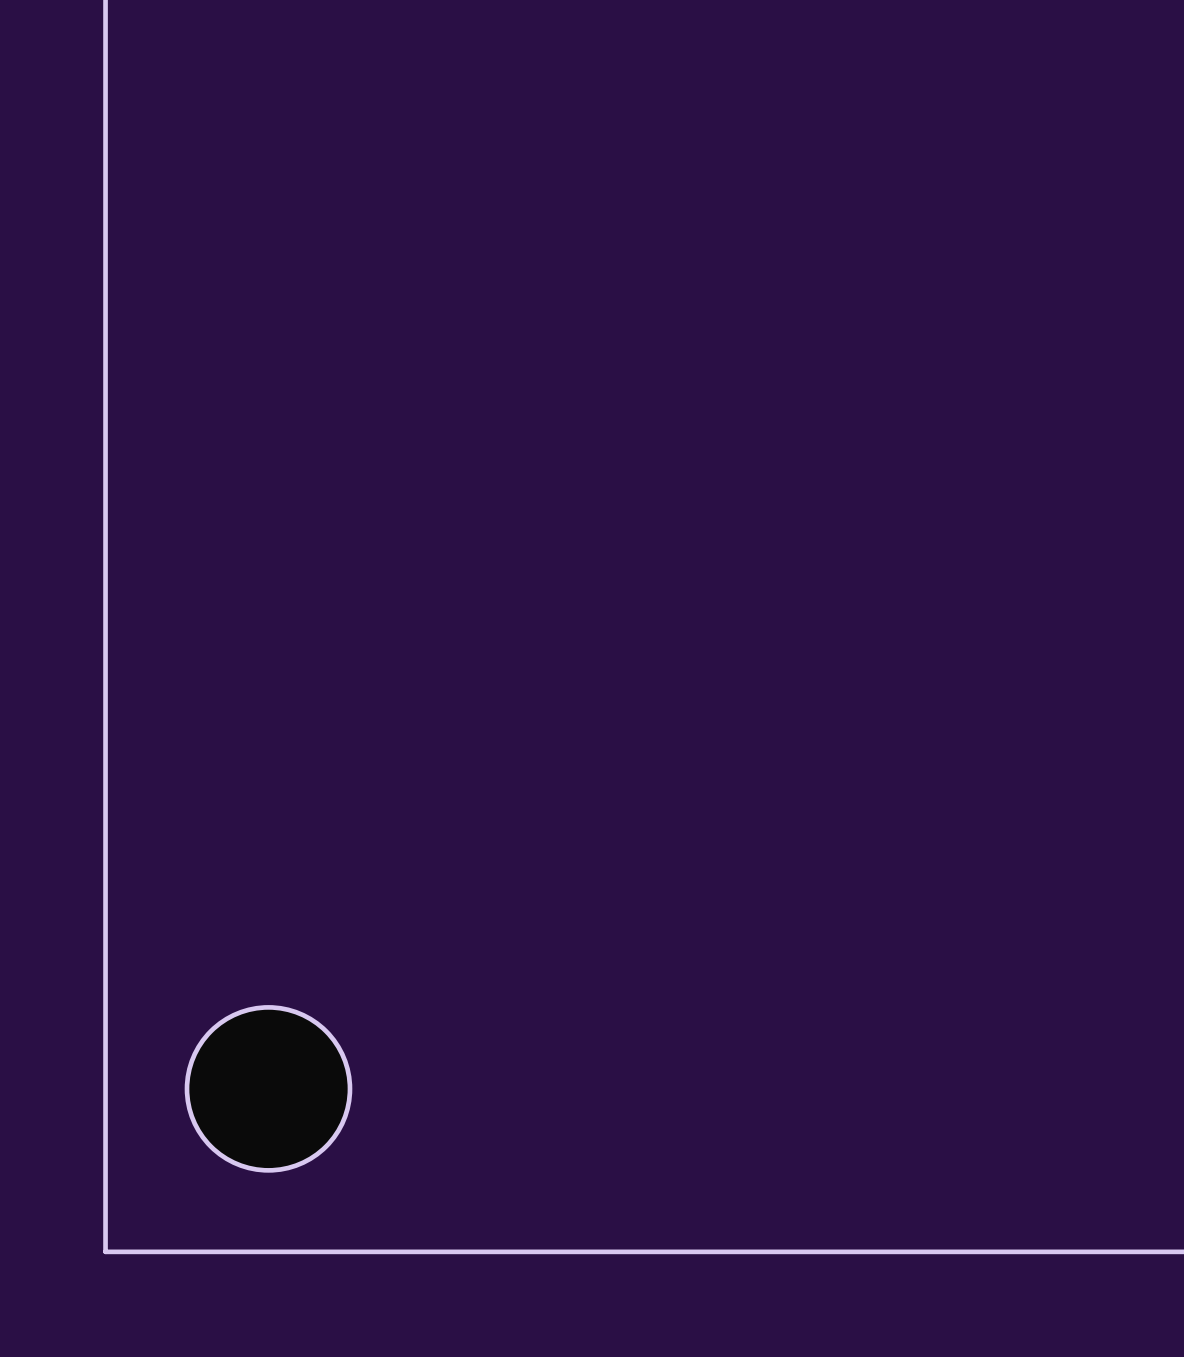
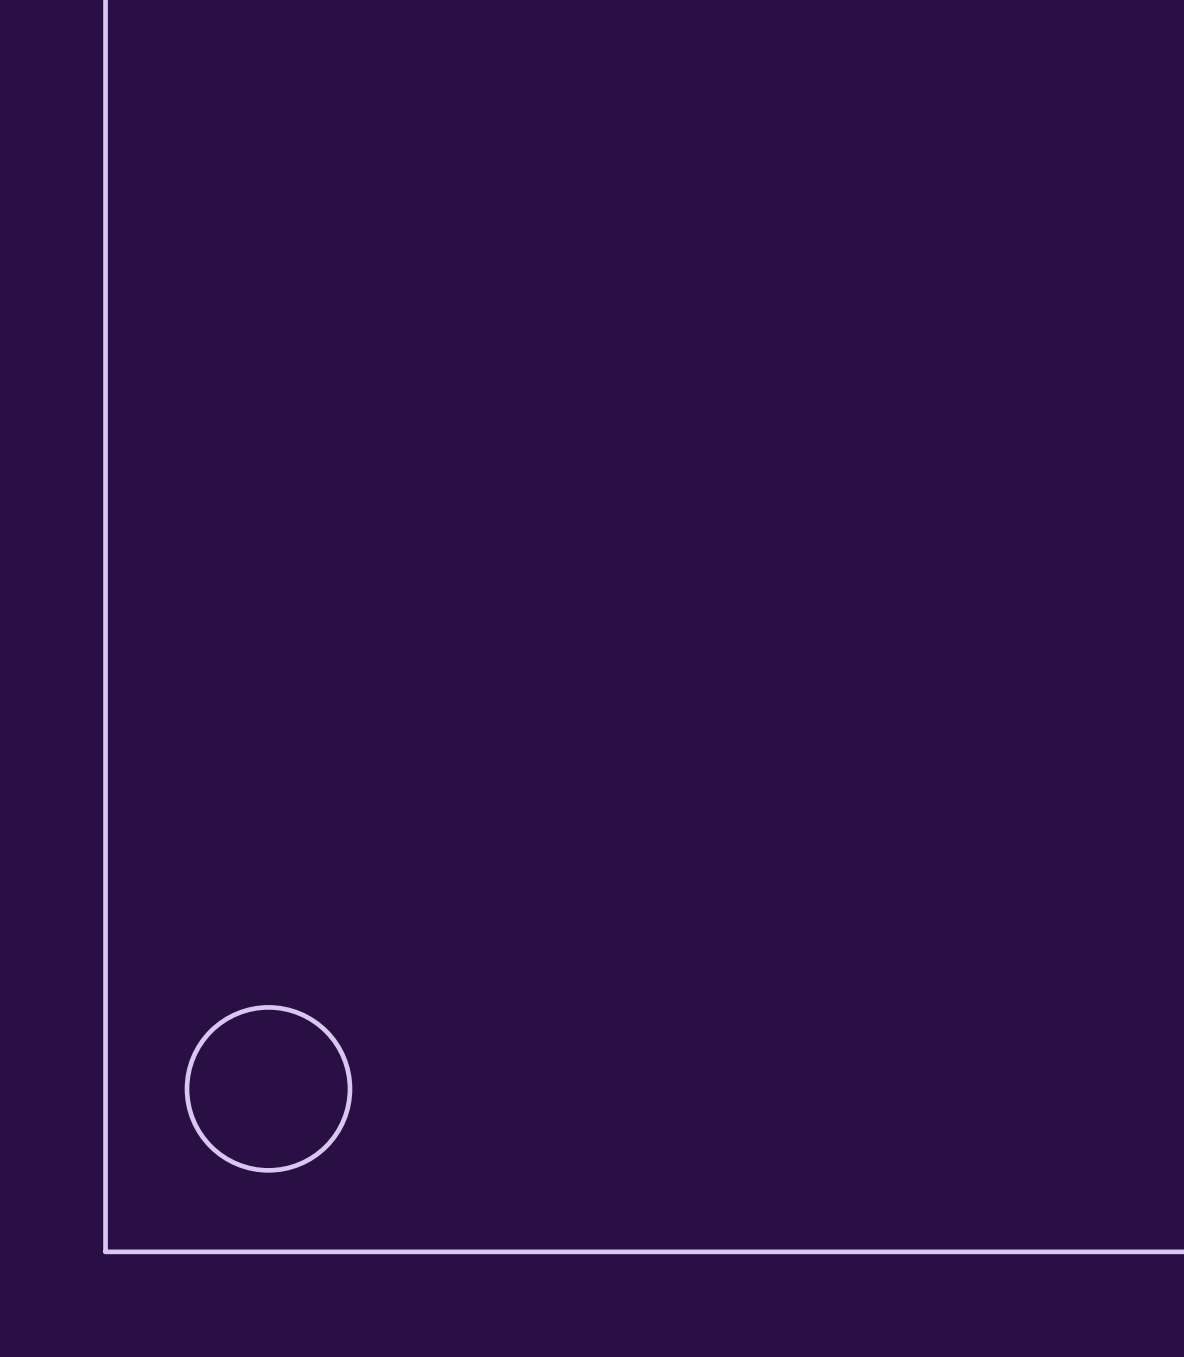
part: (268, 1089) -> none

